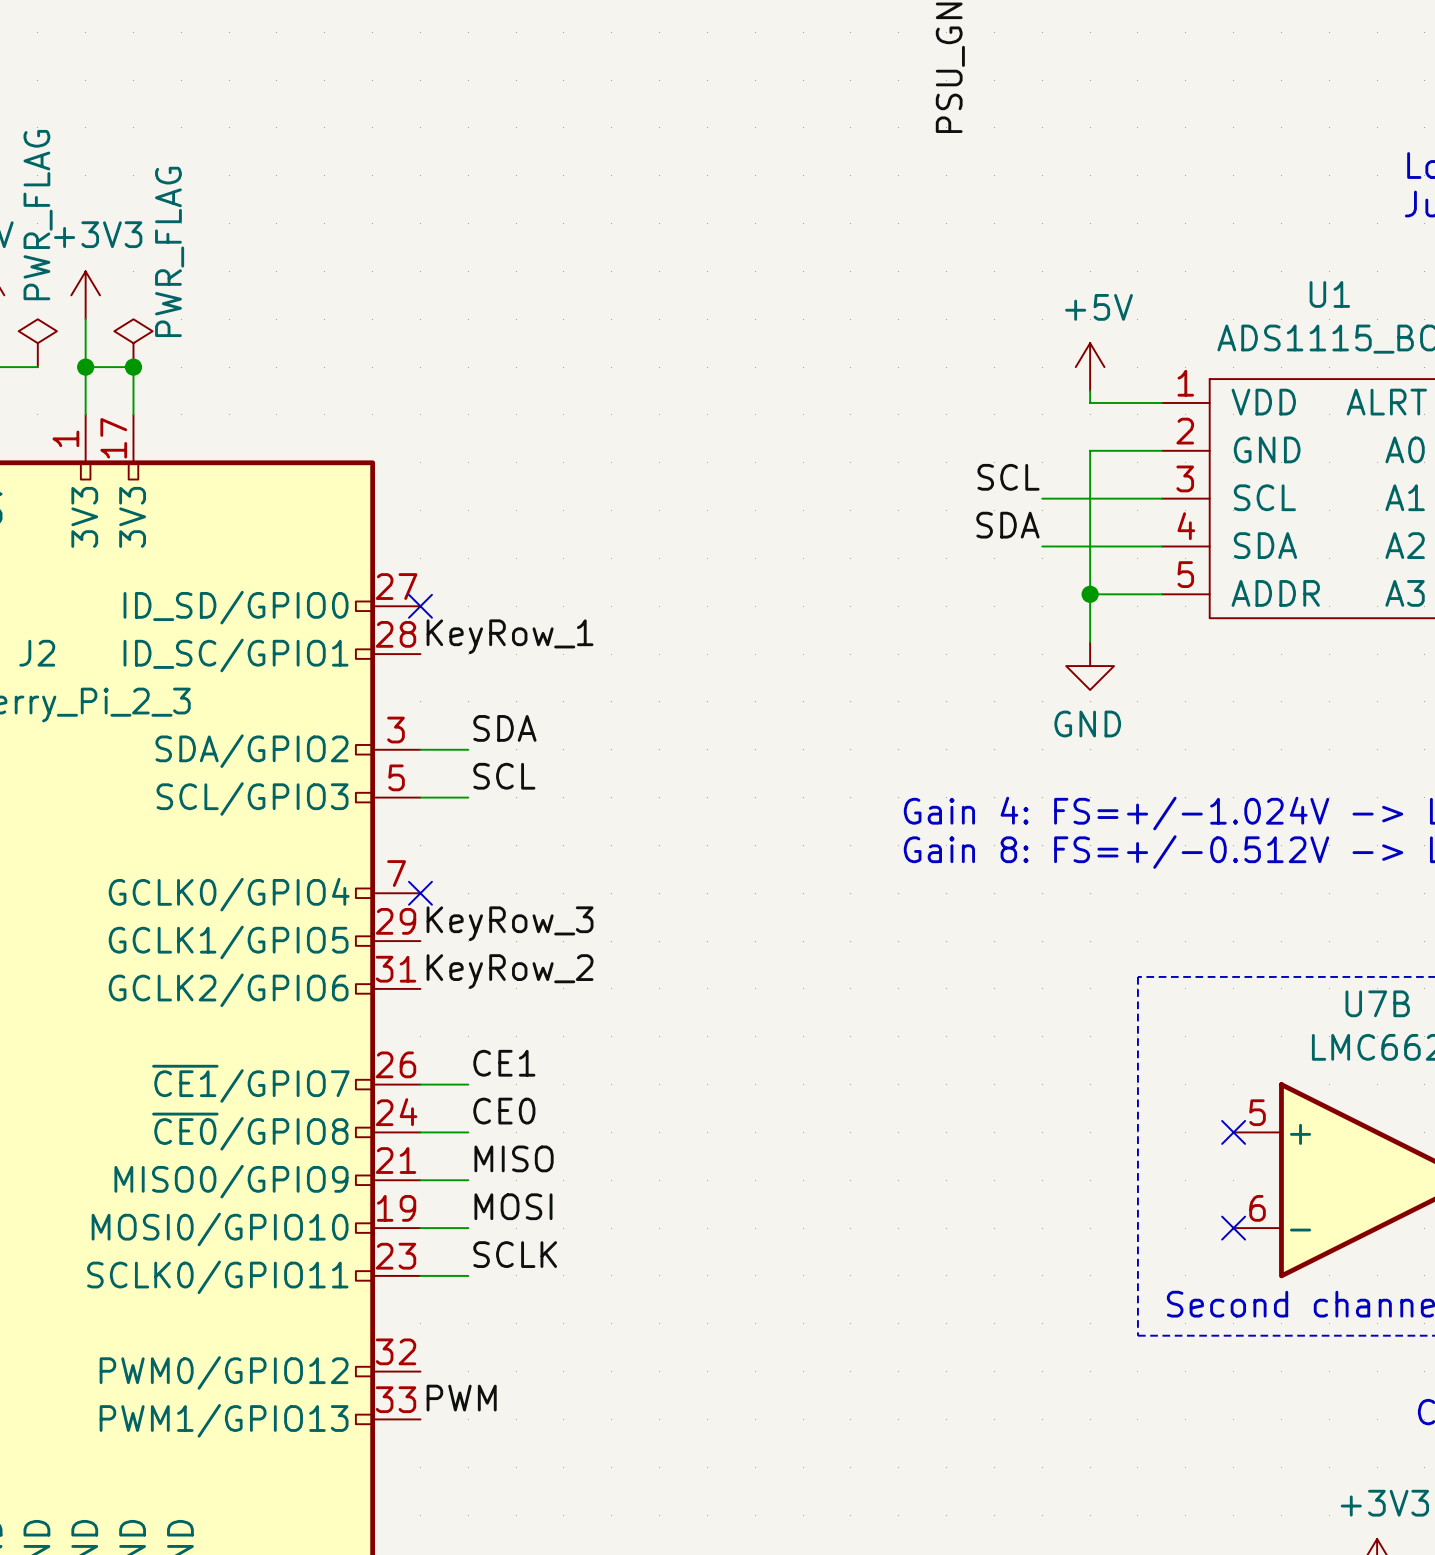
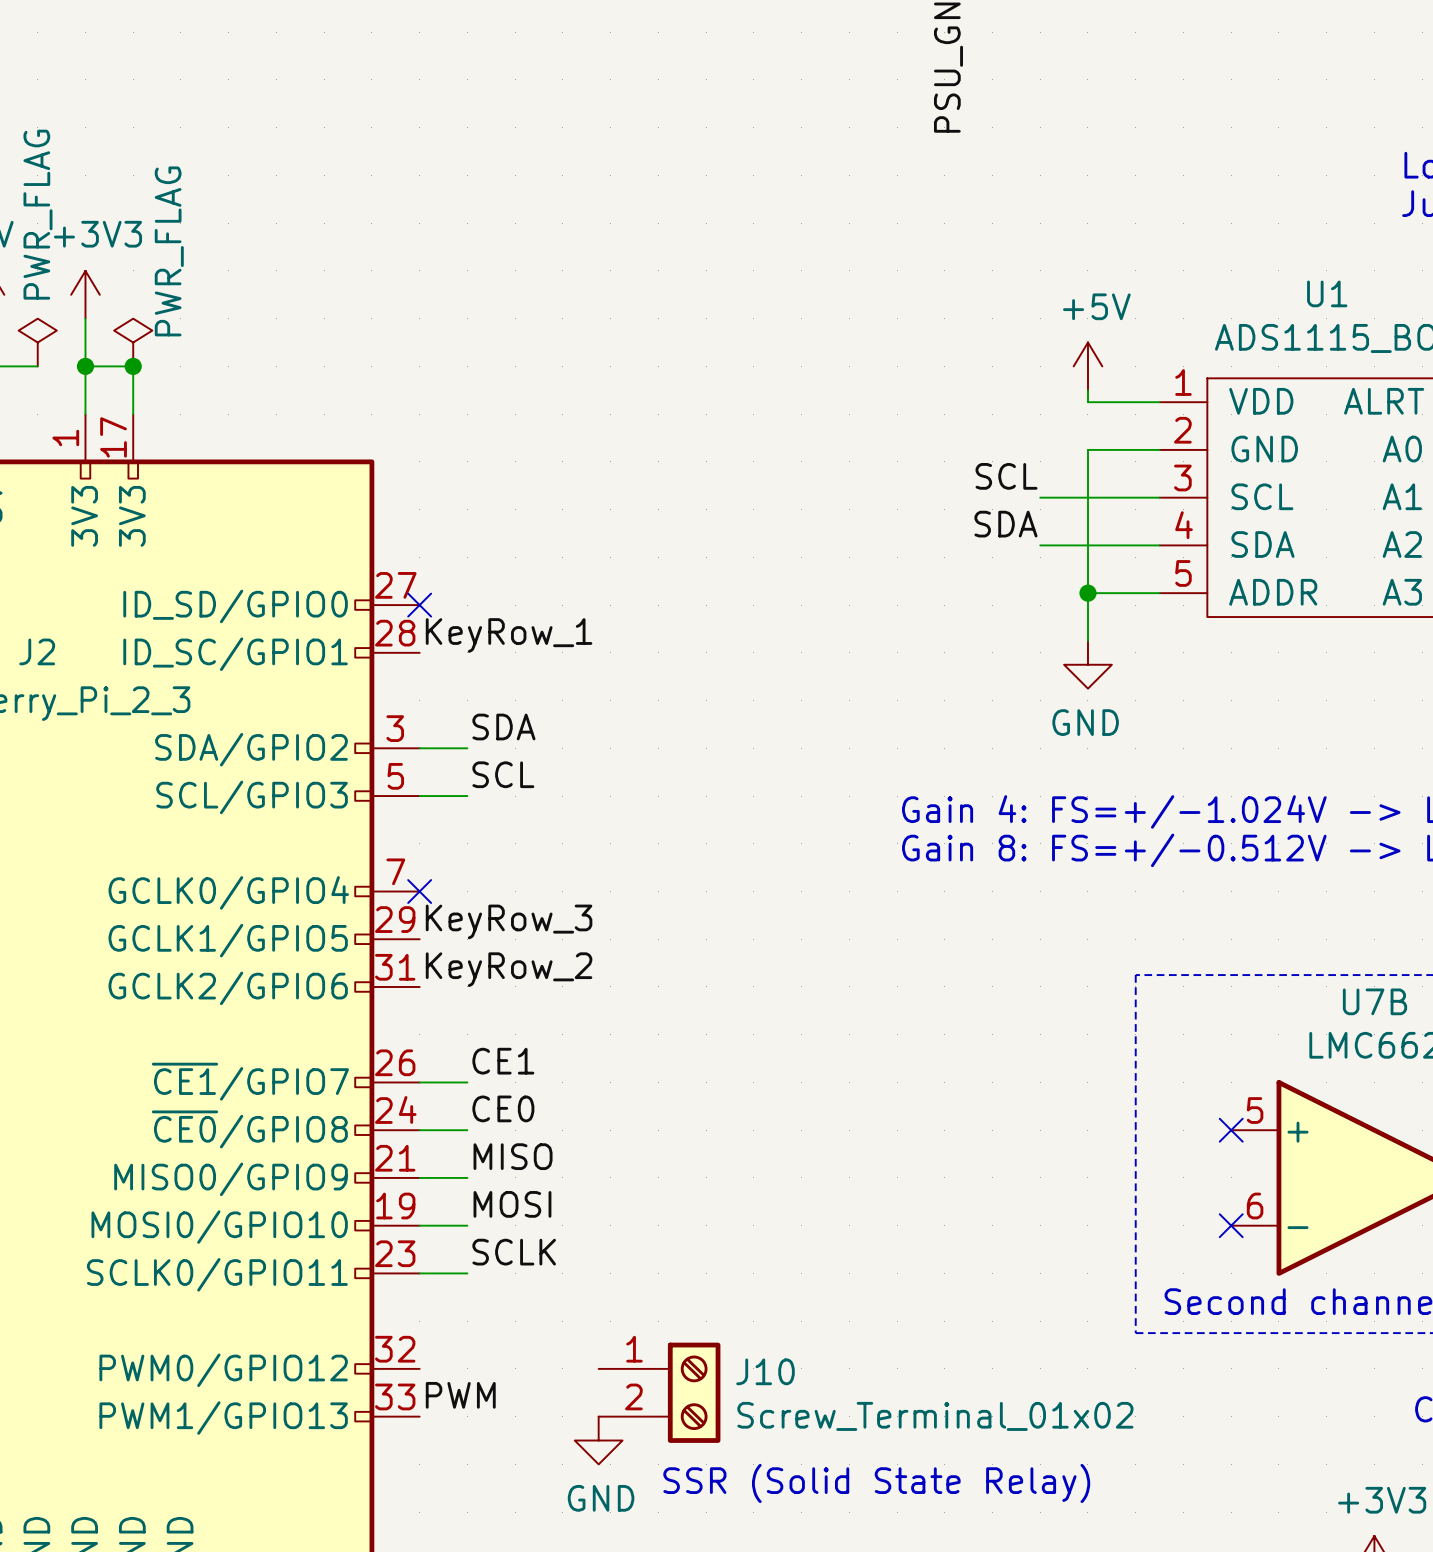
J10: none -> Screw_Terminal_01x02 (659, 1392)
power symbol: none -> GND (598, 1440)
text: none -> SSR (Solid State Relay) (876, 1483)

